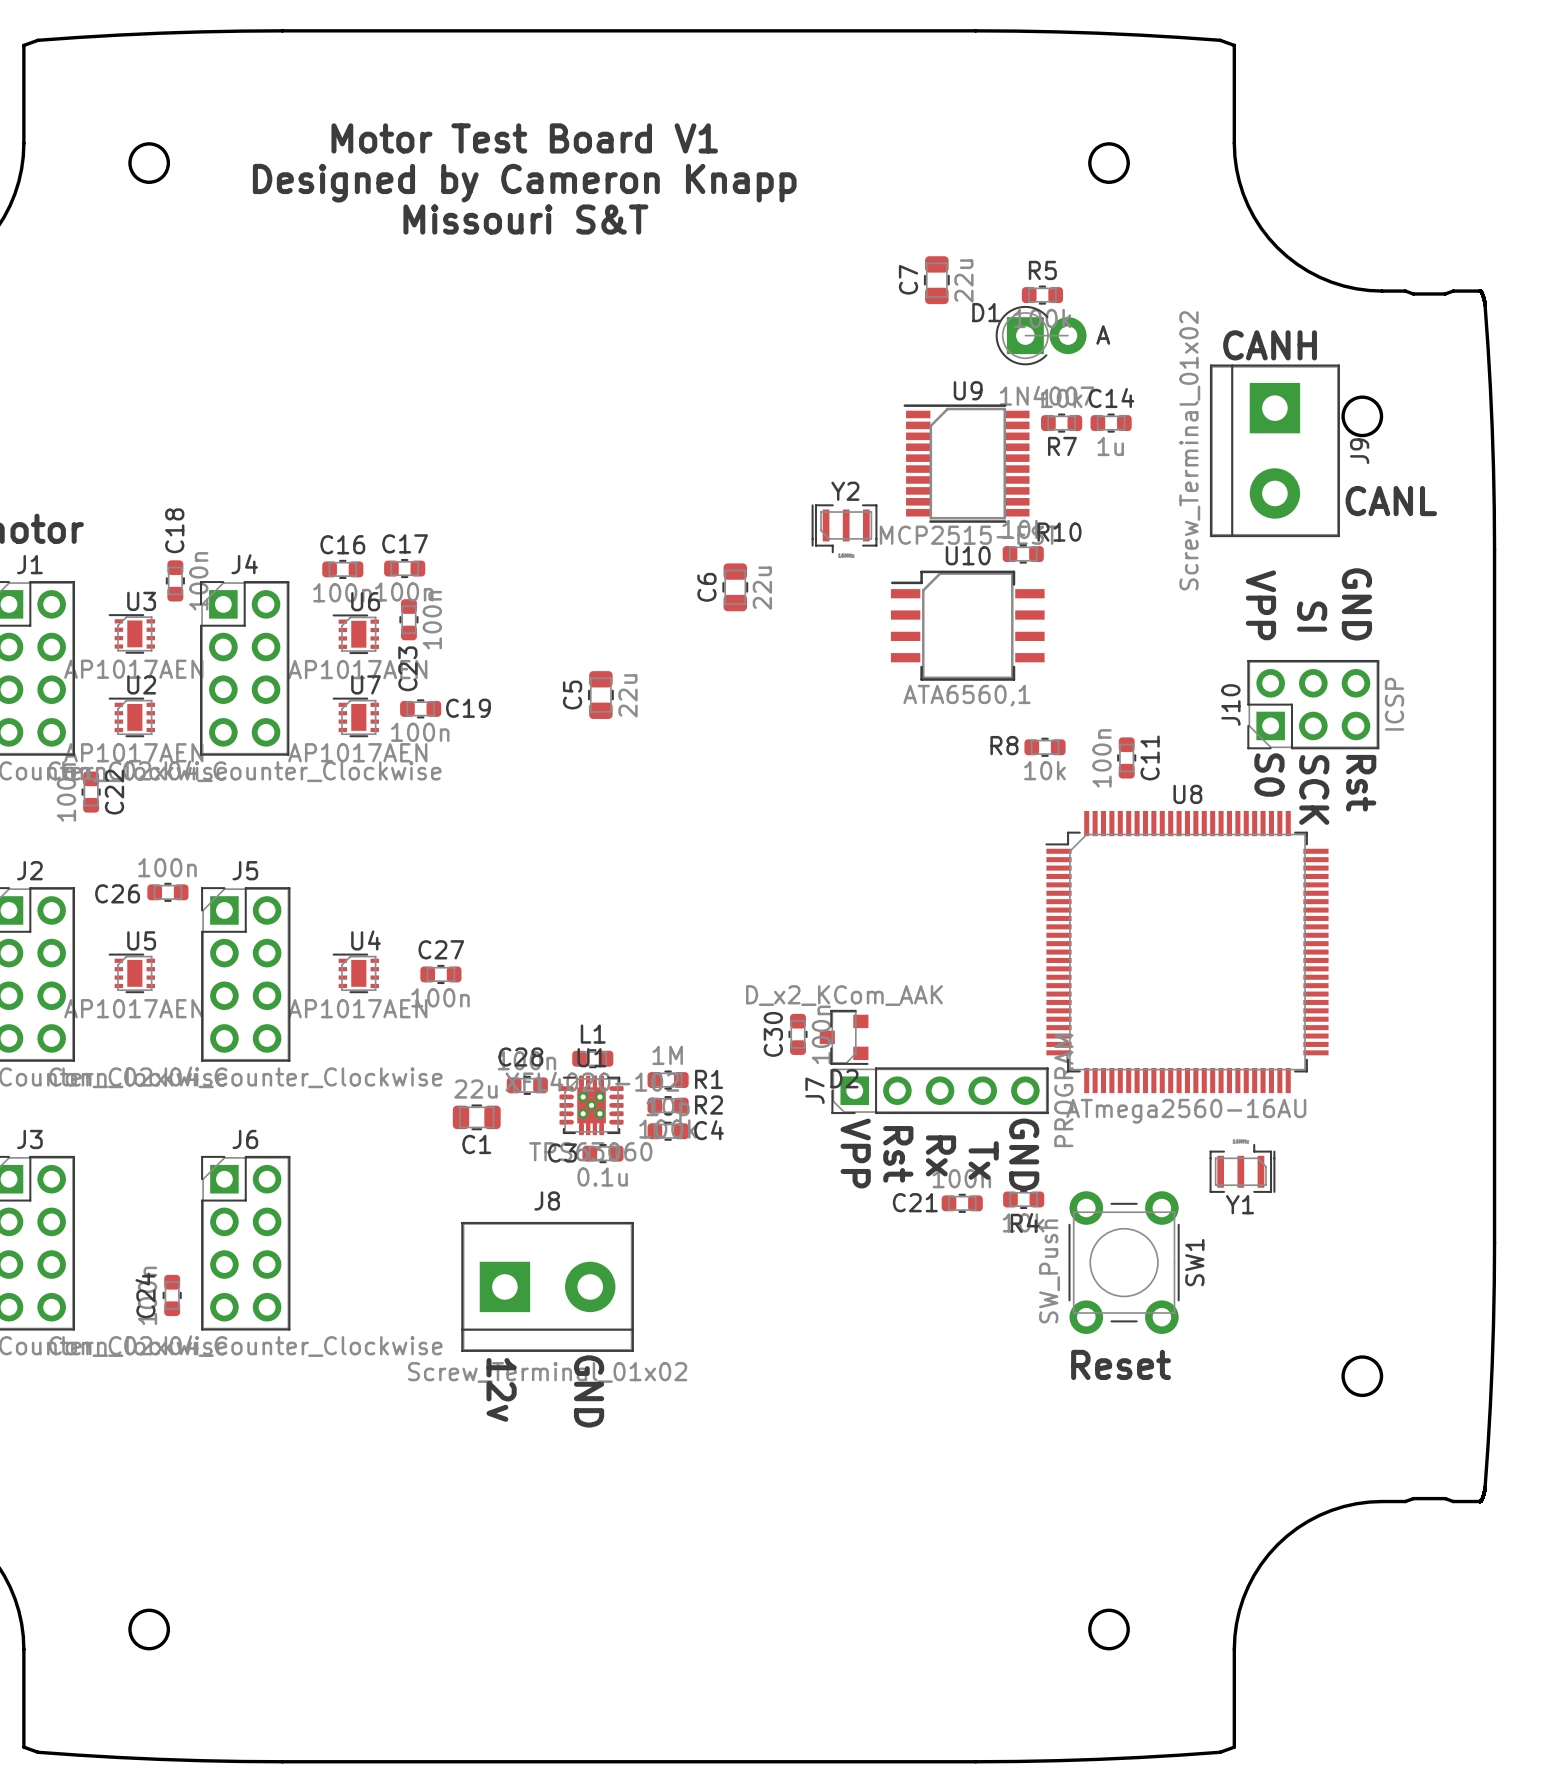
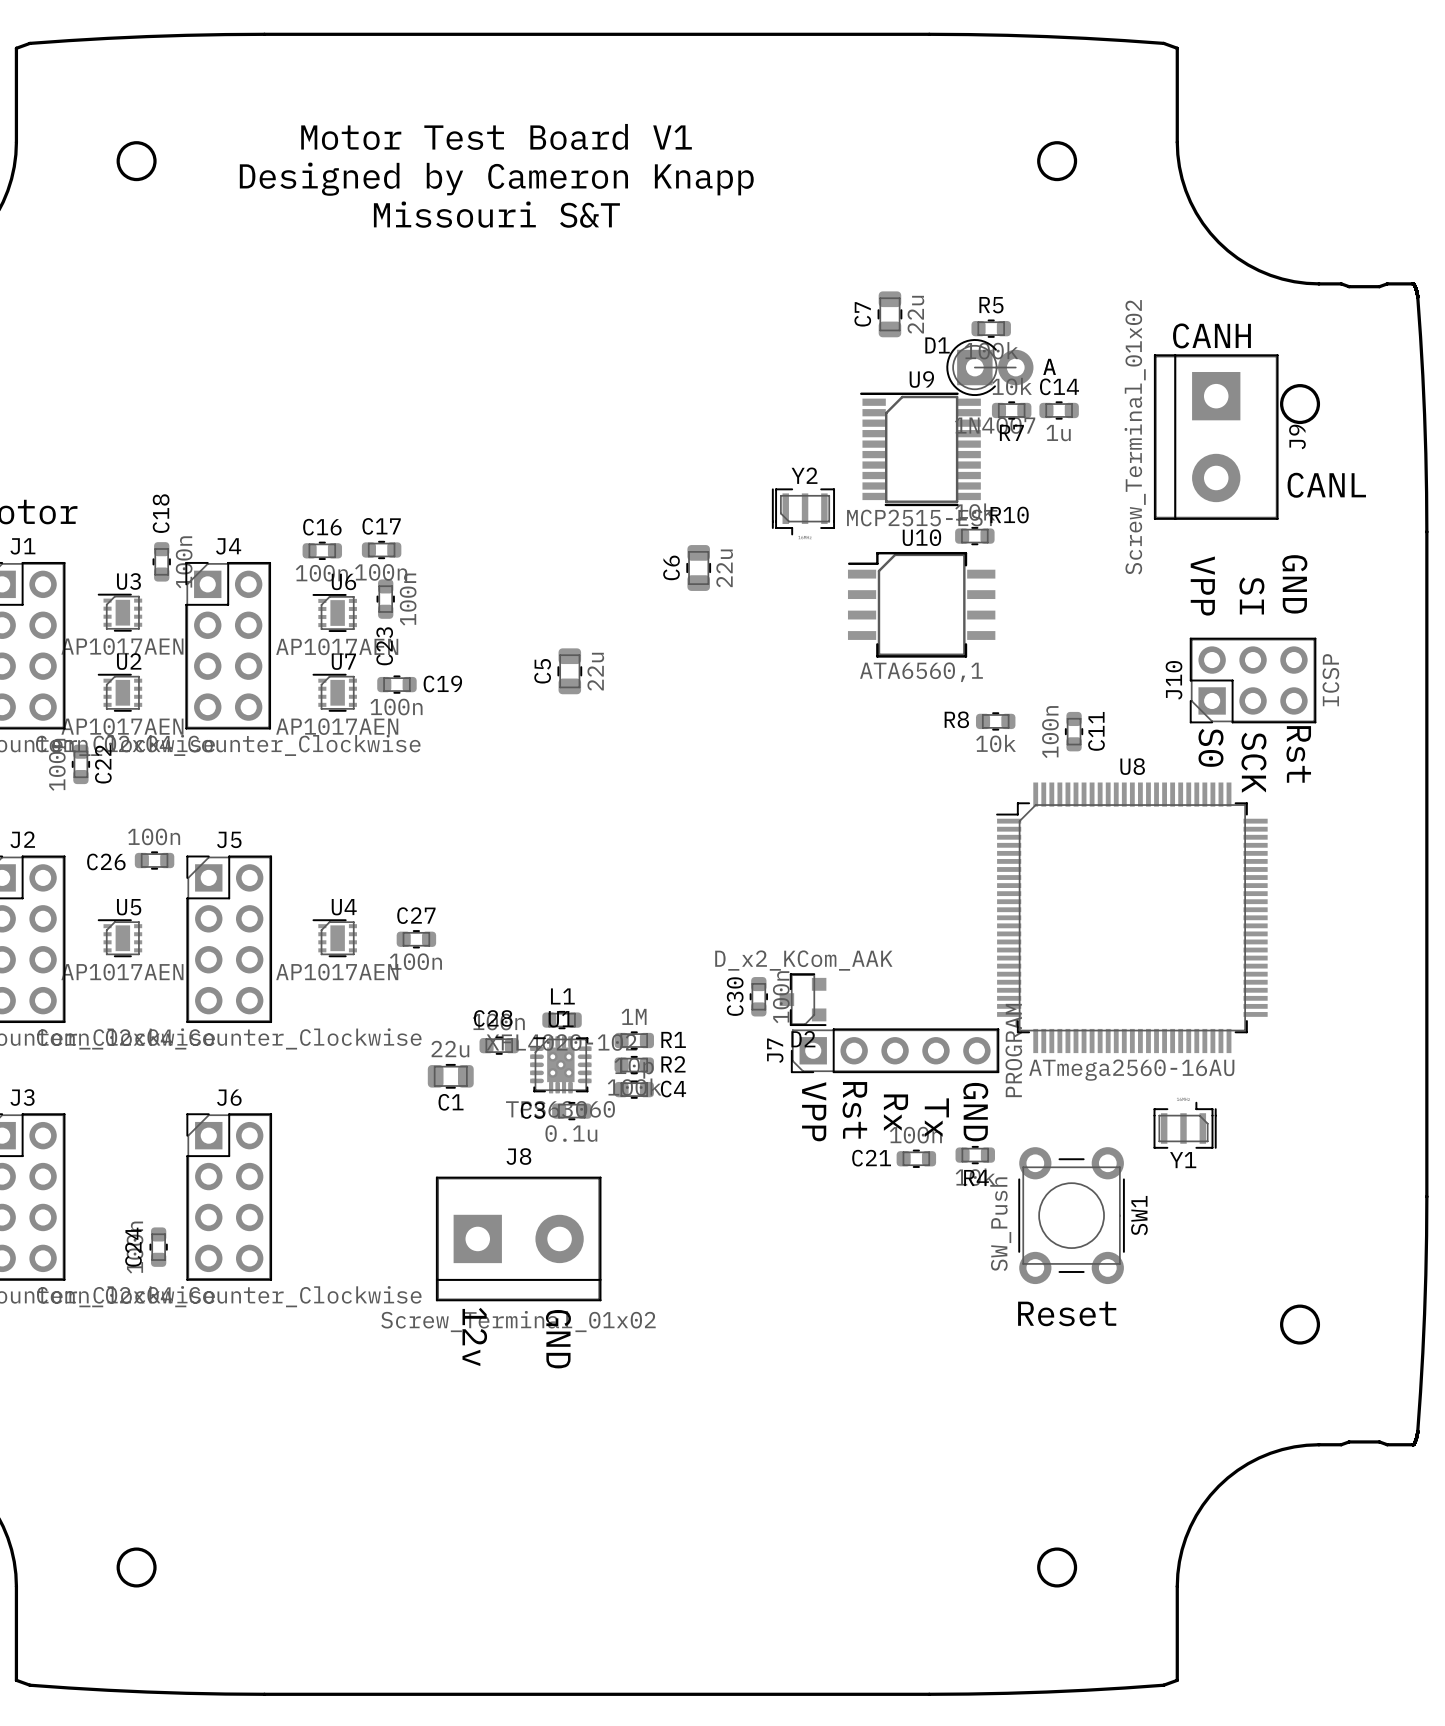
C7 position: (936, 280) -> (889, 314)
R5 position: (1042, 295) -> (991, 328)
D1 position: (1041, 335) -> (989, 367)

